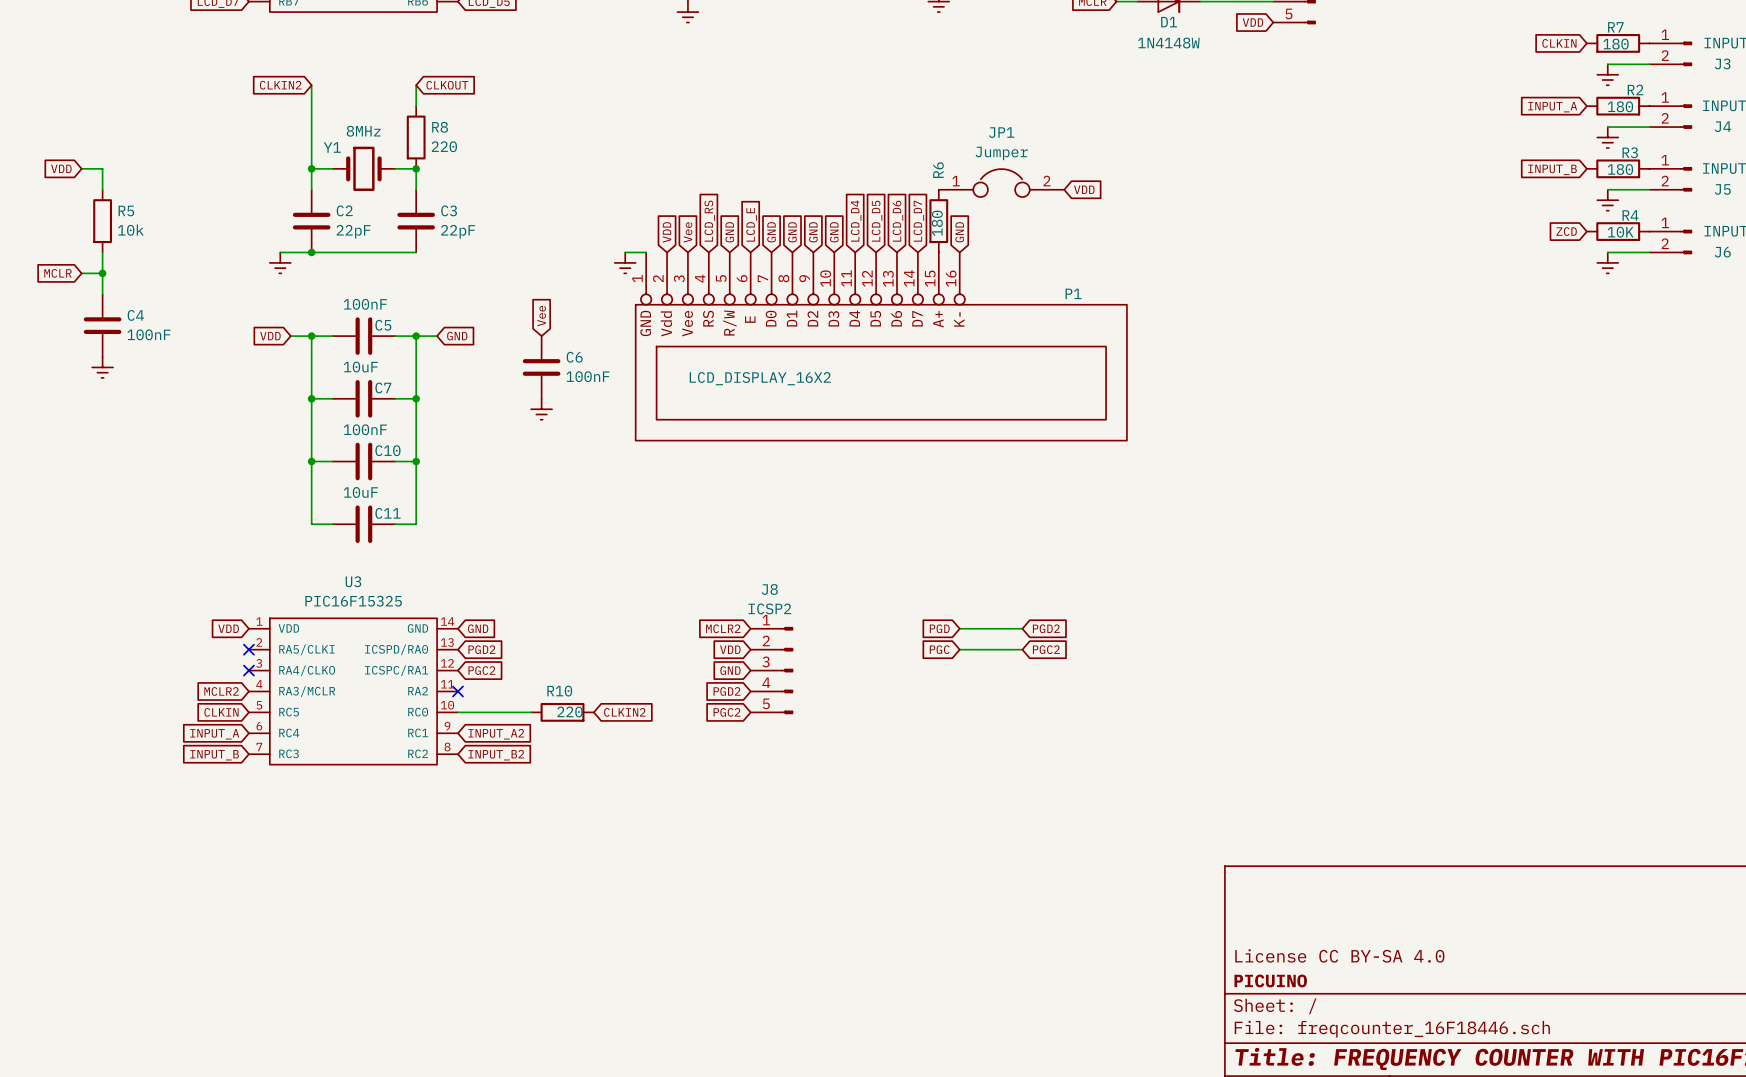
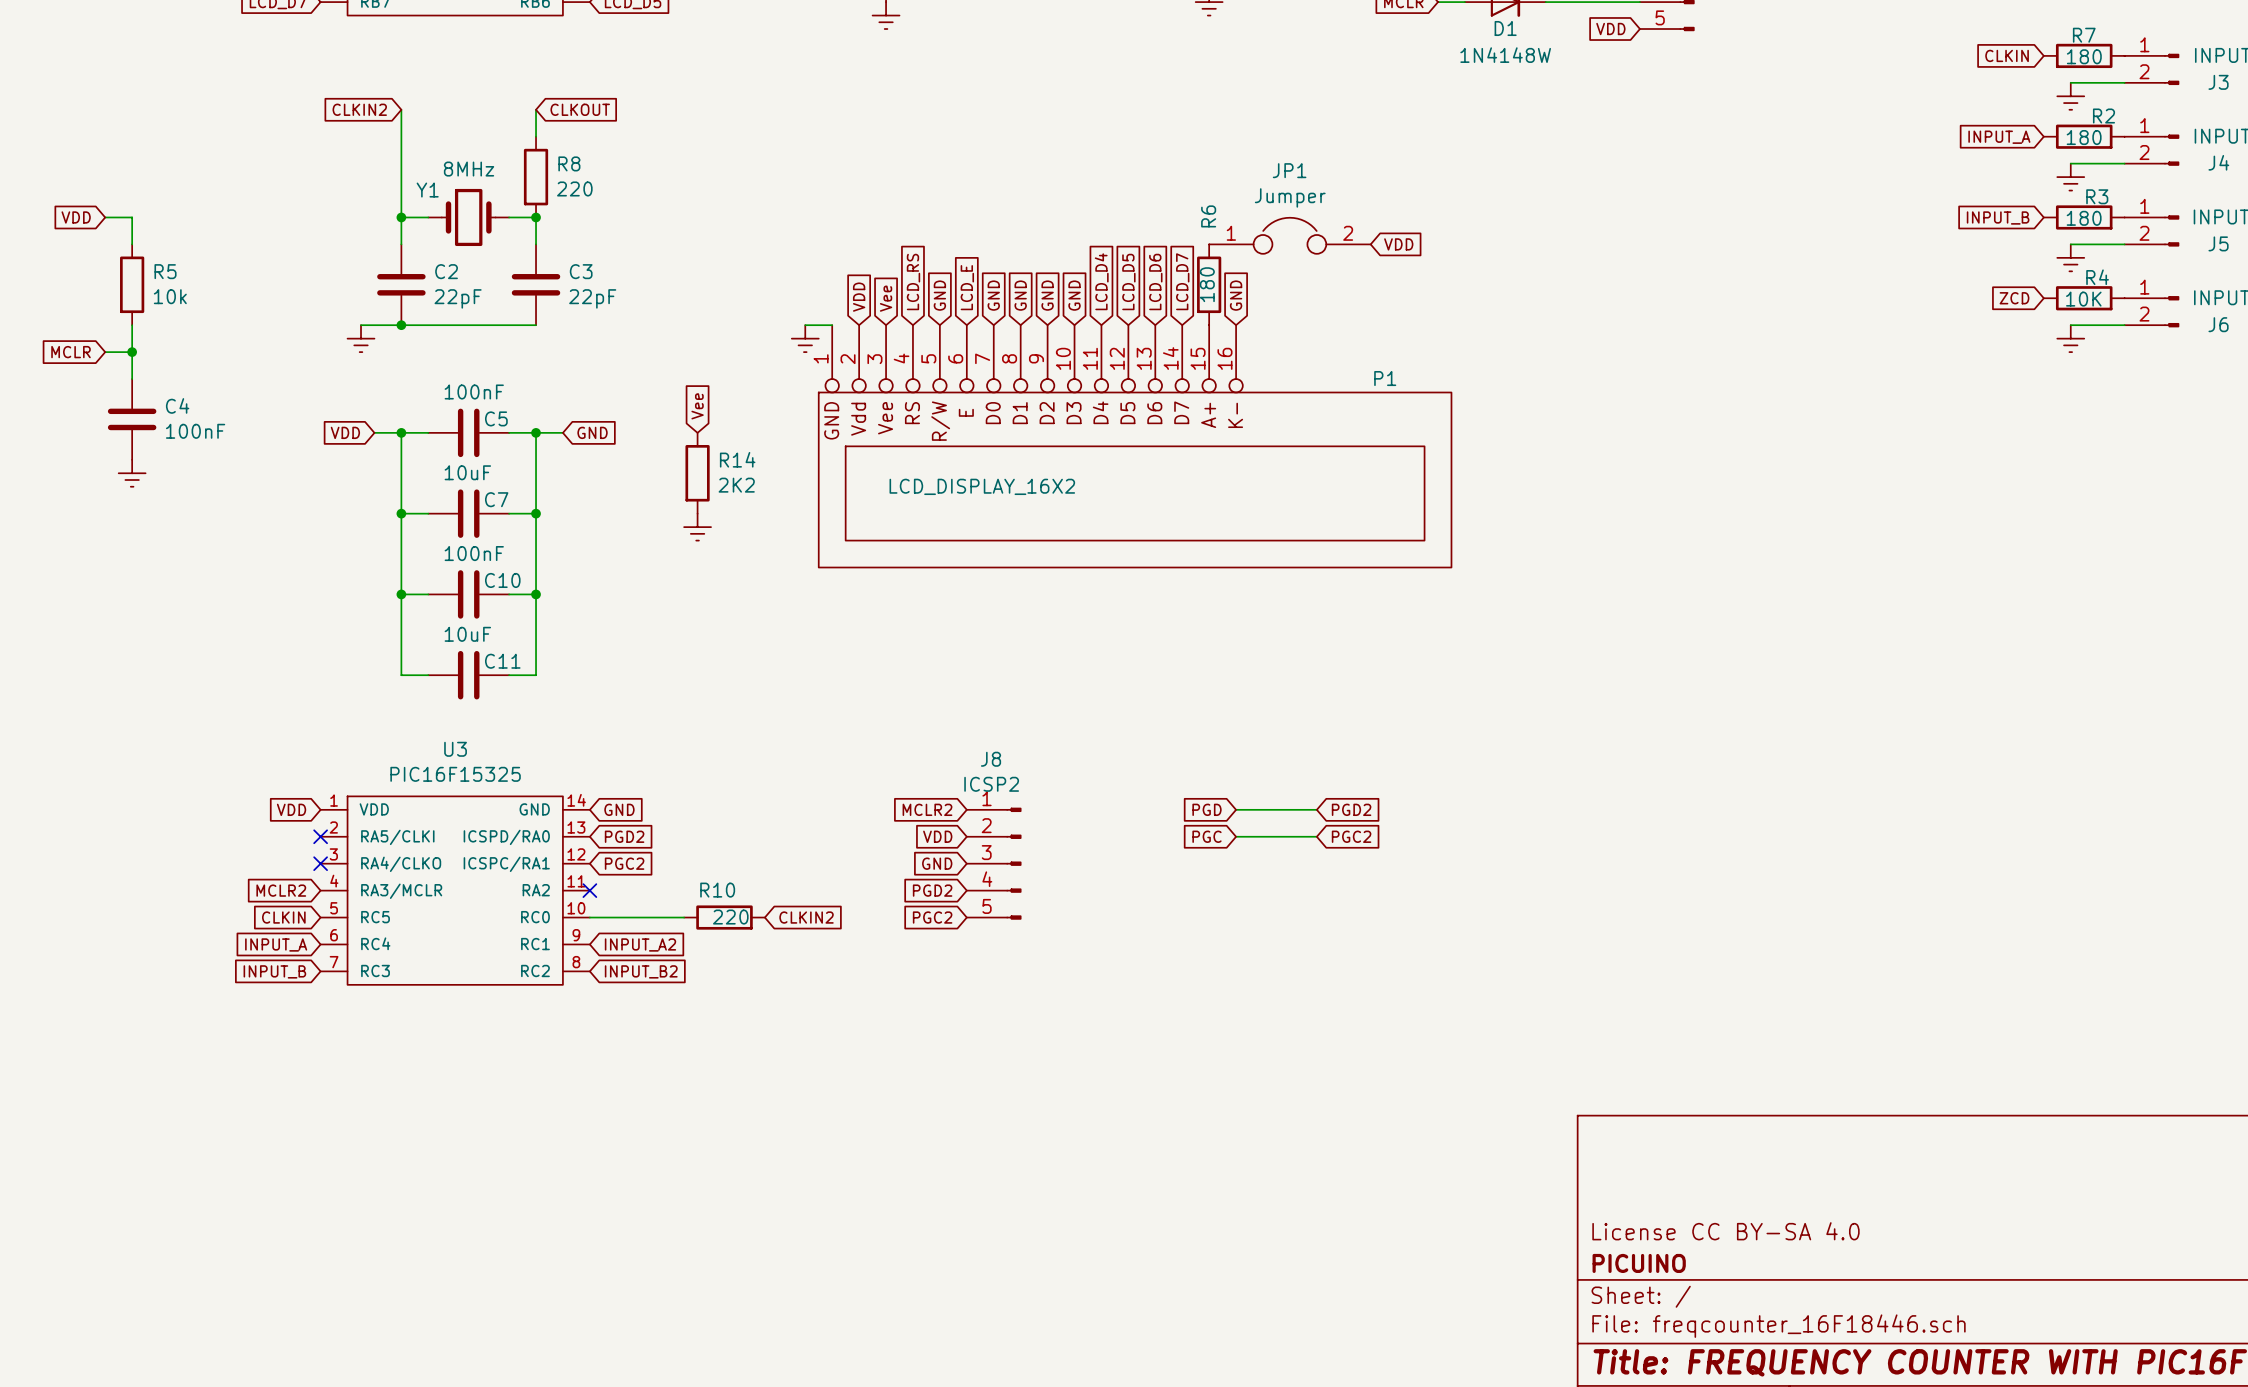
C6: 100nF (541, 367) -> none
R14: none -> 2K2 (697, 473)

